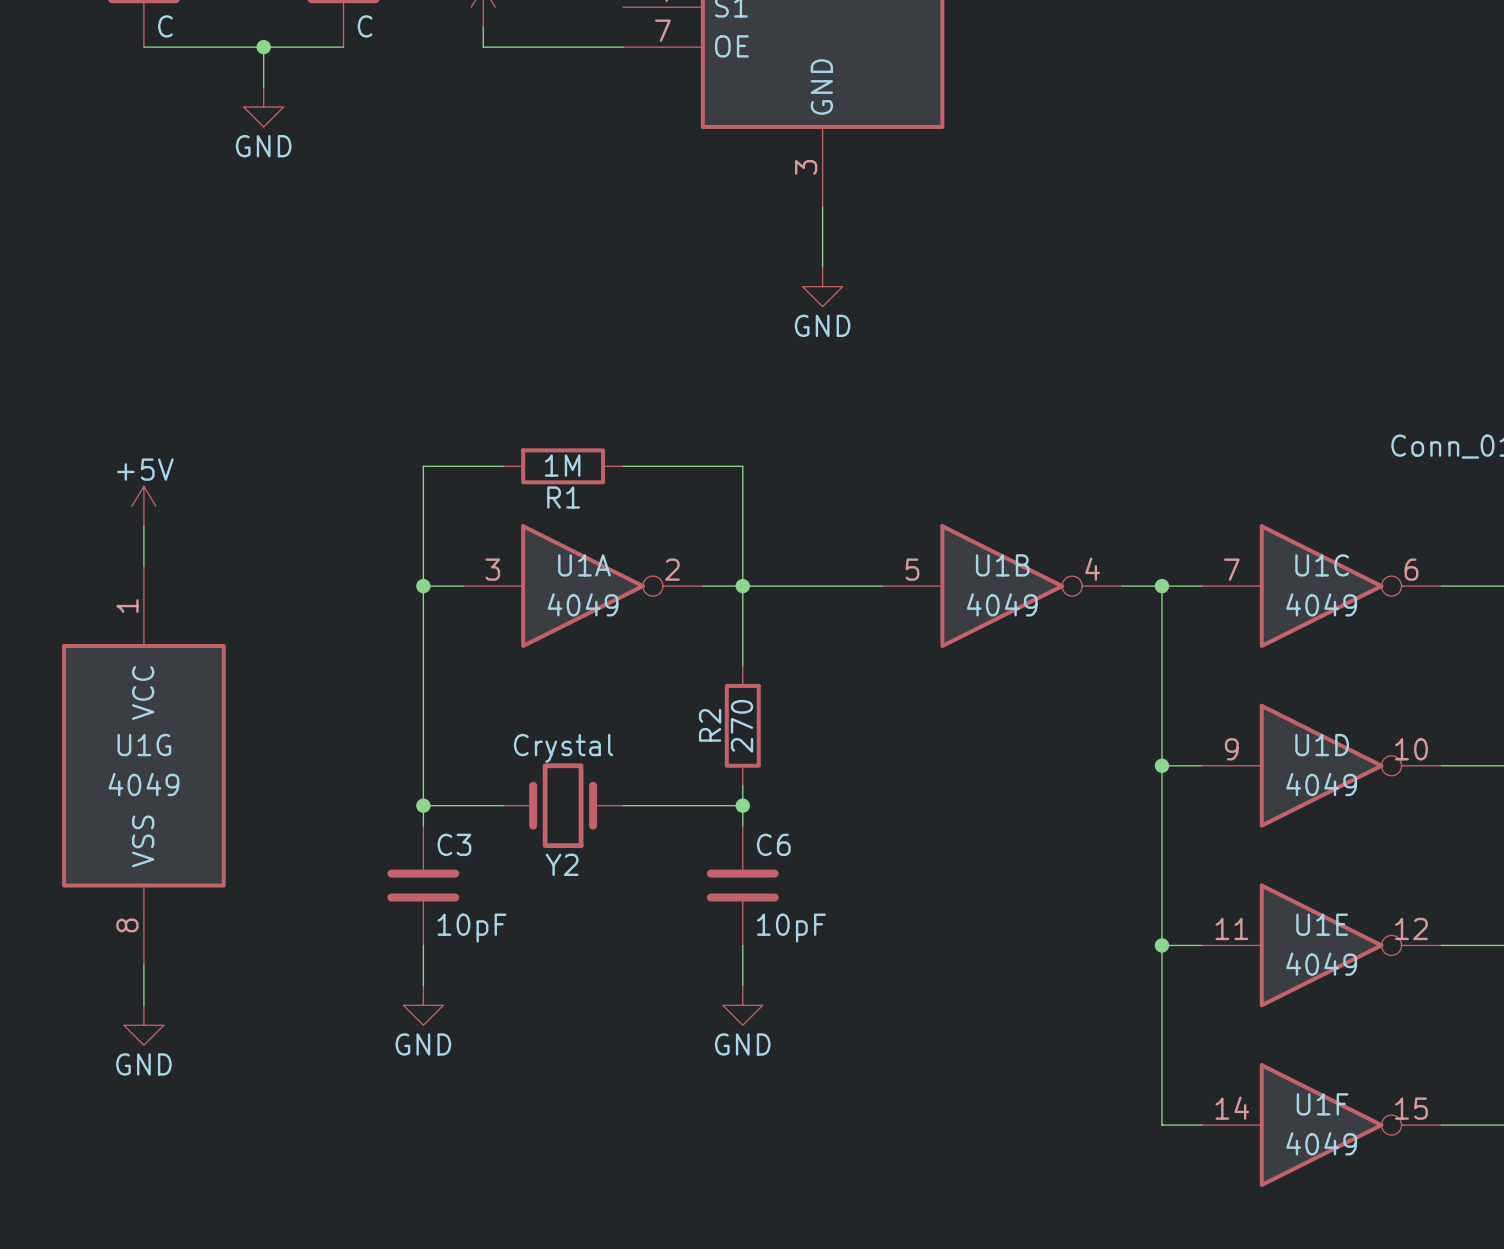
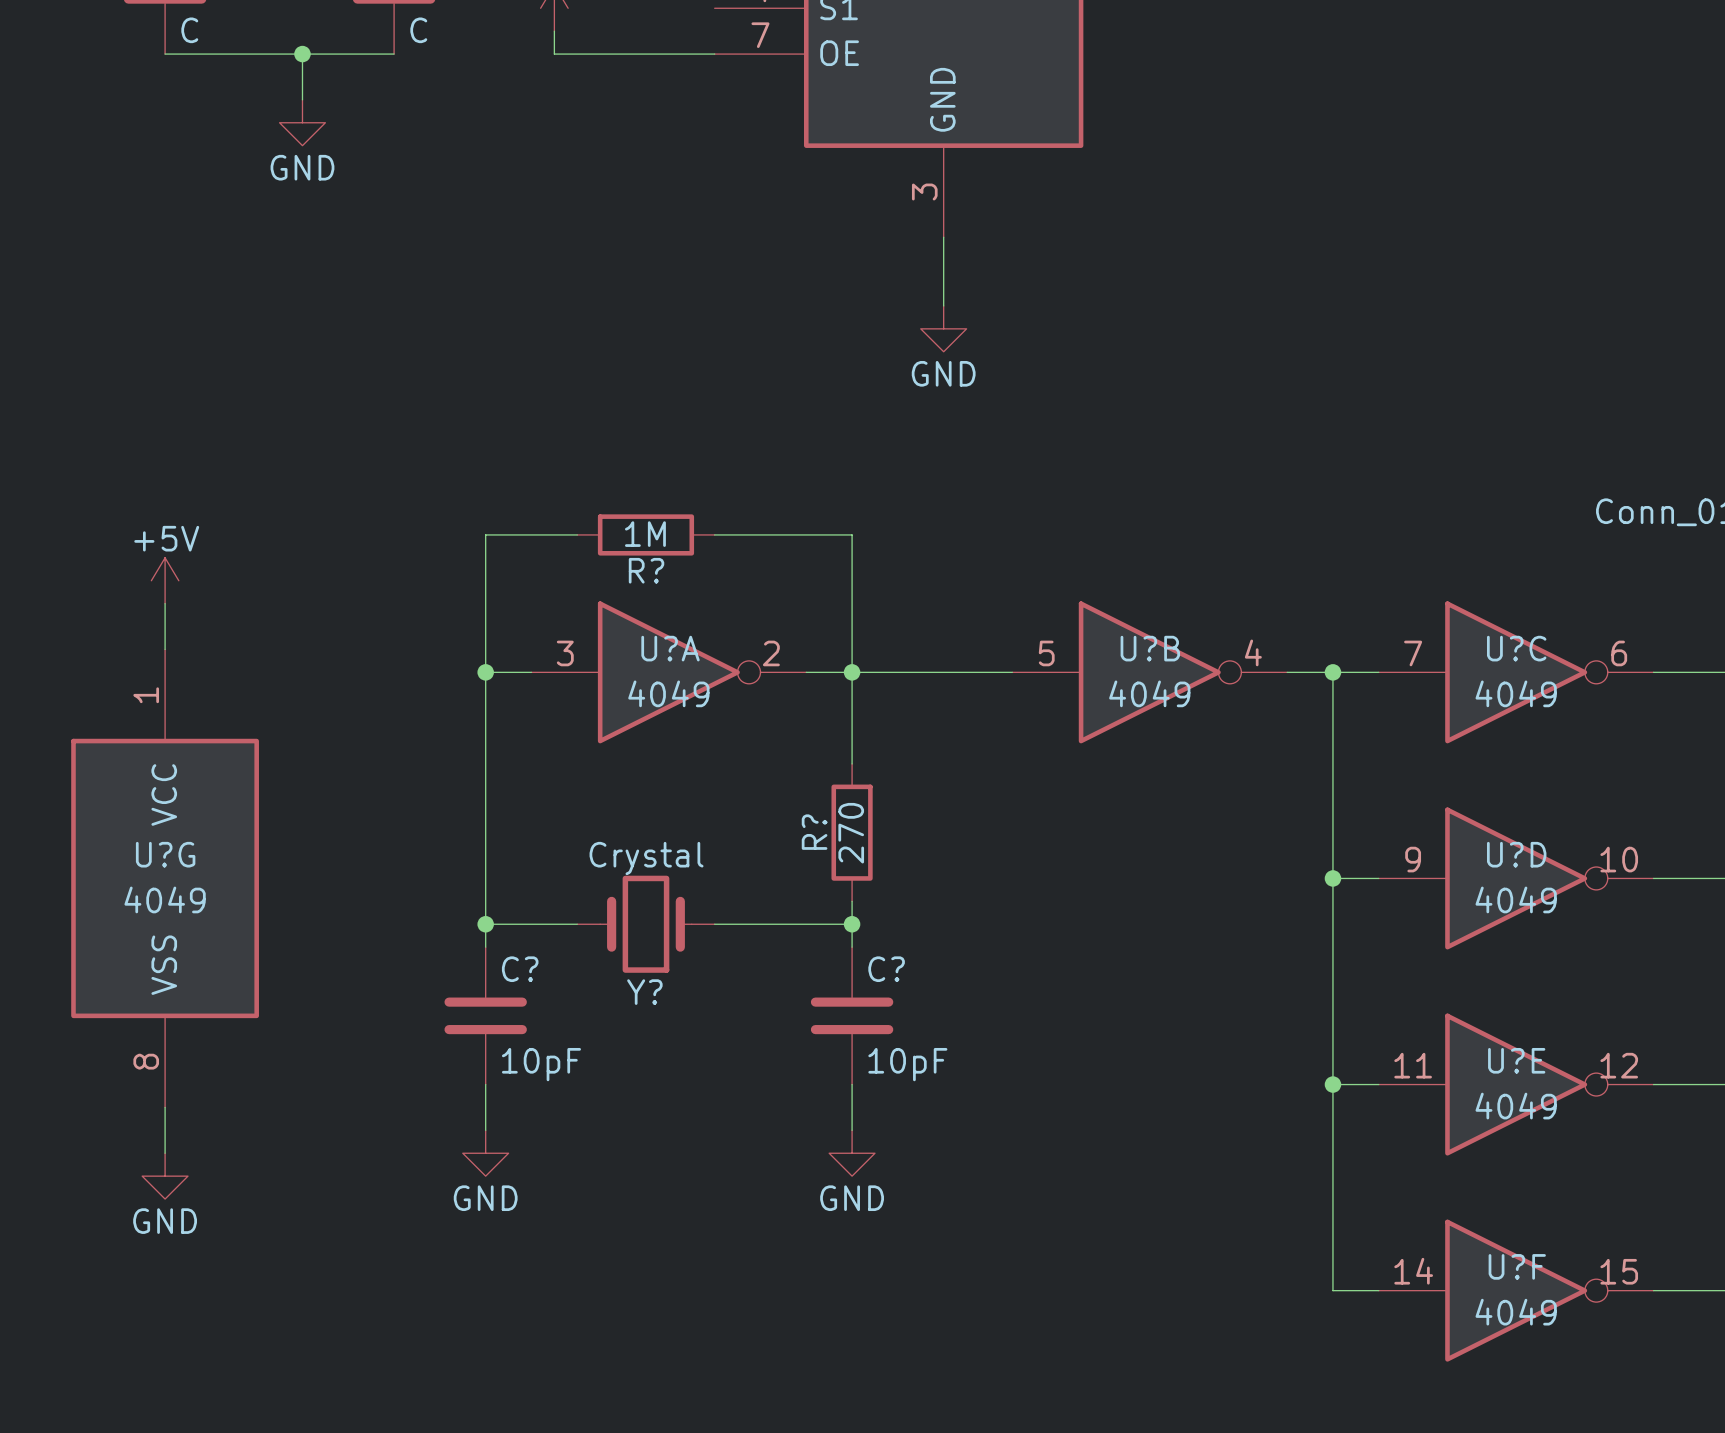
R1 name: R1 (563, 497) -> R? (646, 570)
U1A name: U1A (584, 565) -> U?A (670, 648)
U1B name: U1B (1002, 565) -> U?B (1150, 648)
U1C name: U1C (1322, 565) -> U?C (1516, 648)
R2 name: R2 (710, 725) -> R? (814, 832)
U1G name: U1G (144, 745) -> U?G (165, 854)
U1D name: U1D (1322, 745) -> U?D (1516, 854)
C3 name: C3 (454, 844) -> C? (520, 969)
C6 name: C6 (773, 844) -> C? (886, 969)
Y2 name: Y2 (562, 864) -> Y? (644, 992)
U1E name: U1E (1322, 924) -> U?E (1516, 1060)
U1F name: U1F (1322, 1104) -> U?F (1517, 1266)

